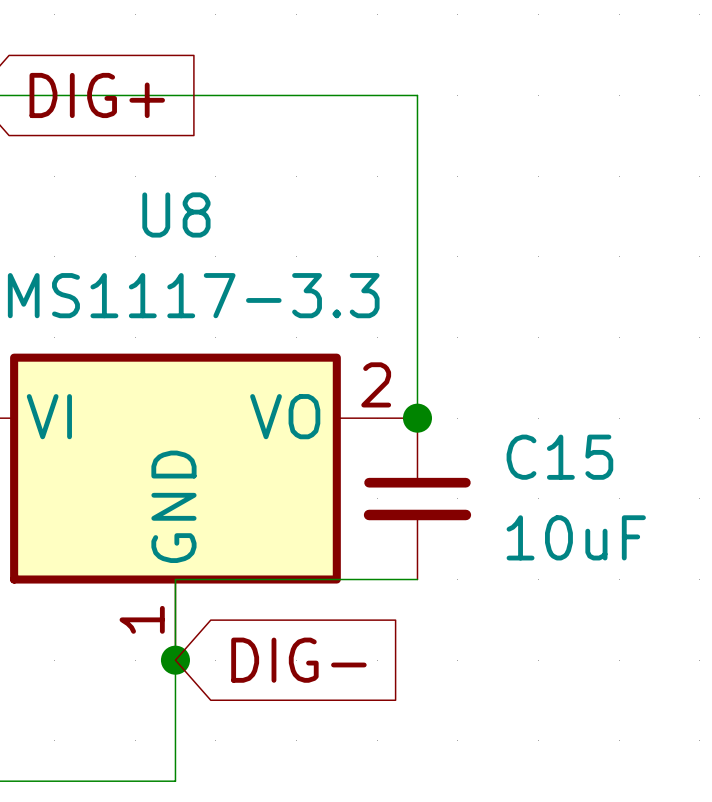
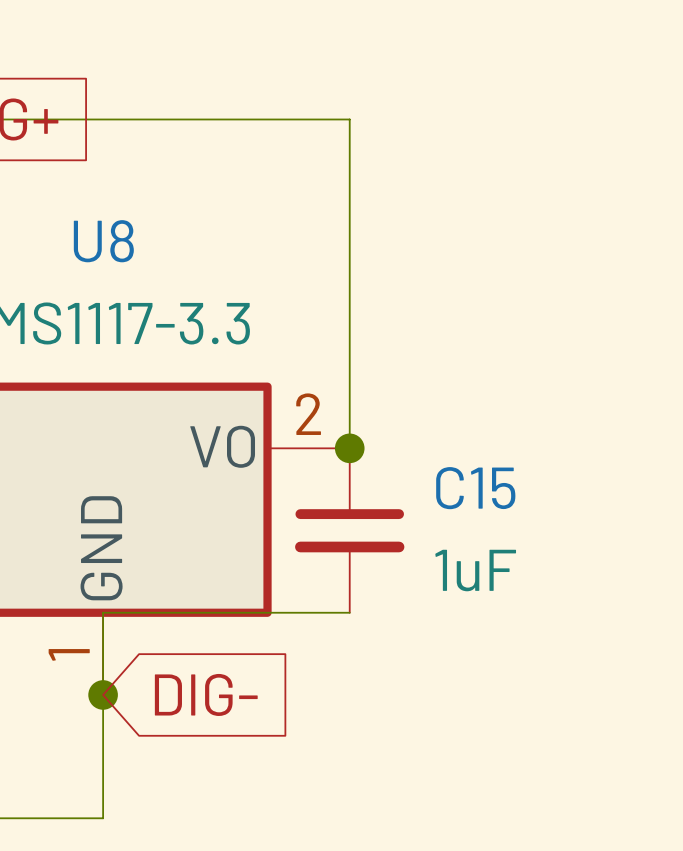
C15 value: 10uF (576, 537) -> 1uF (475, 570)

